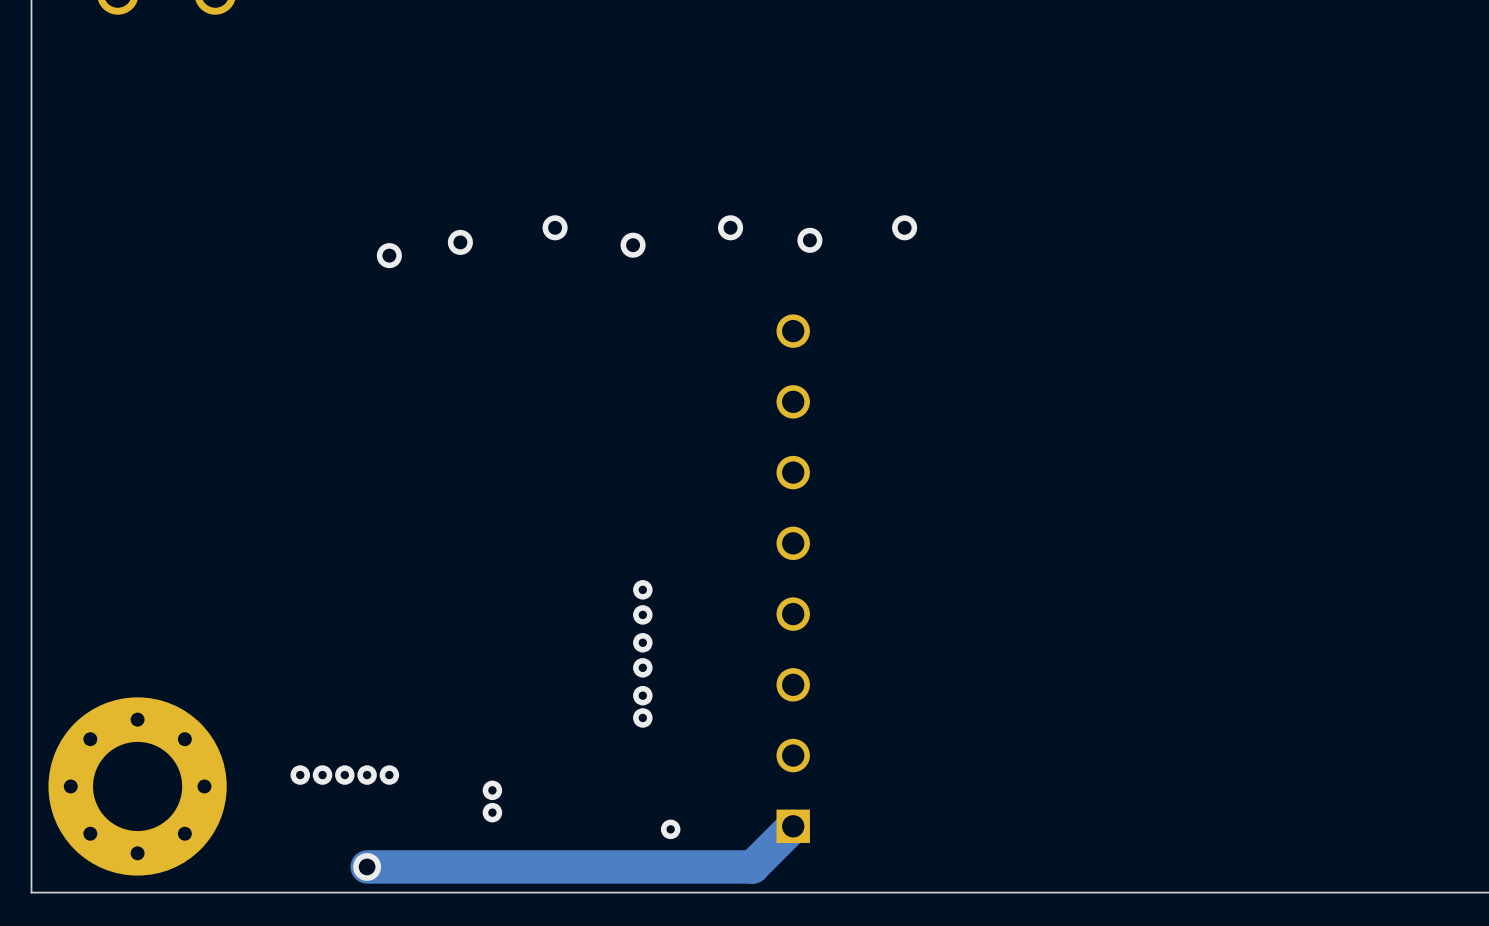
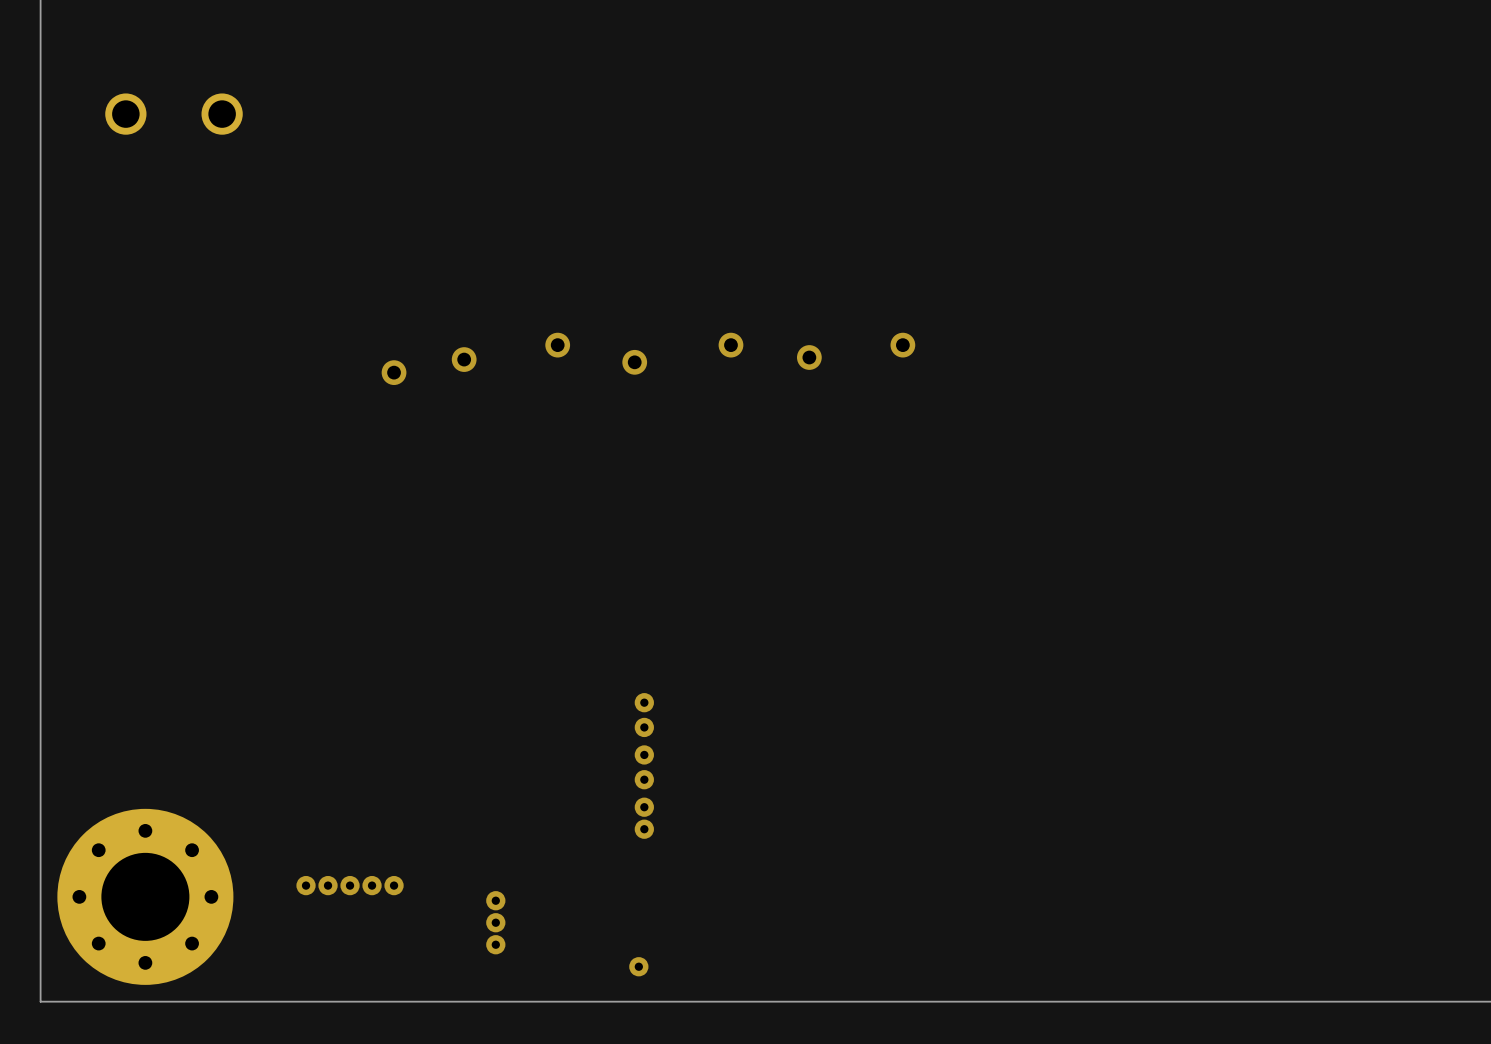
part: (793, 578) -> none
track: (793, 826) (752, 866) (367, 866) -> none
via position: (670, 829) -> (638, 966)
via: none -> (495, 944)
via: (367, 866) -> none

